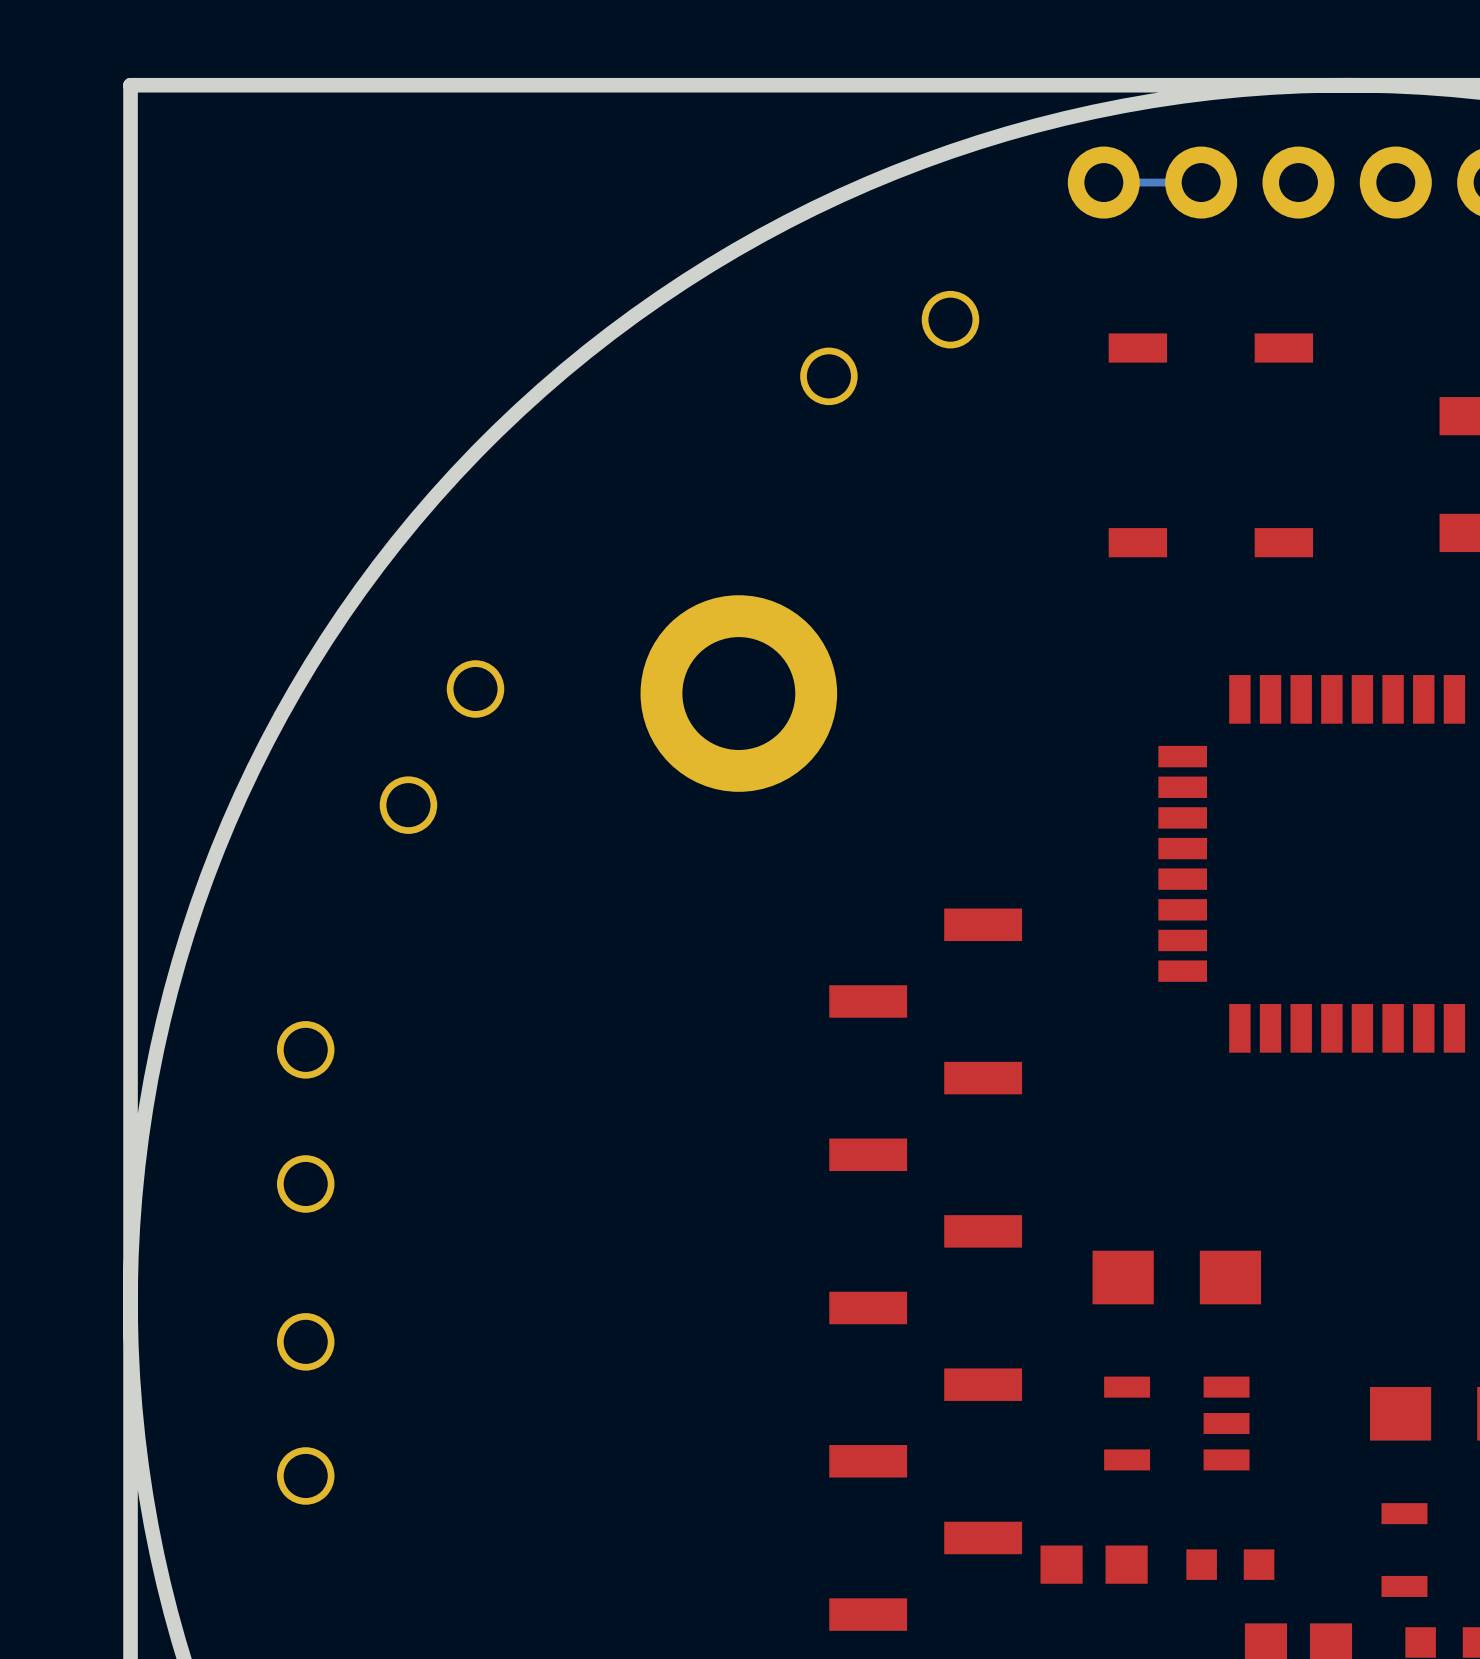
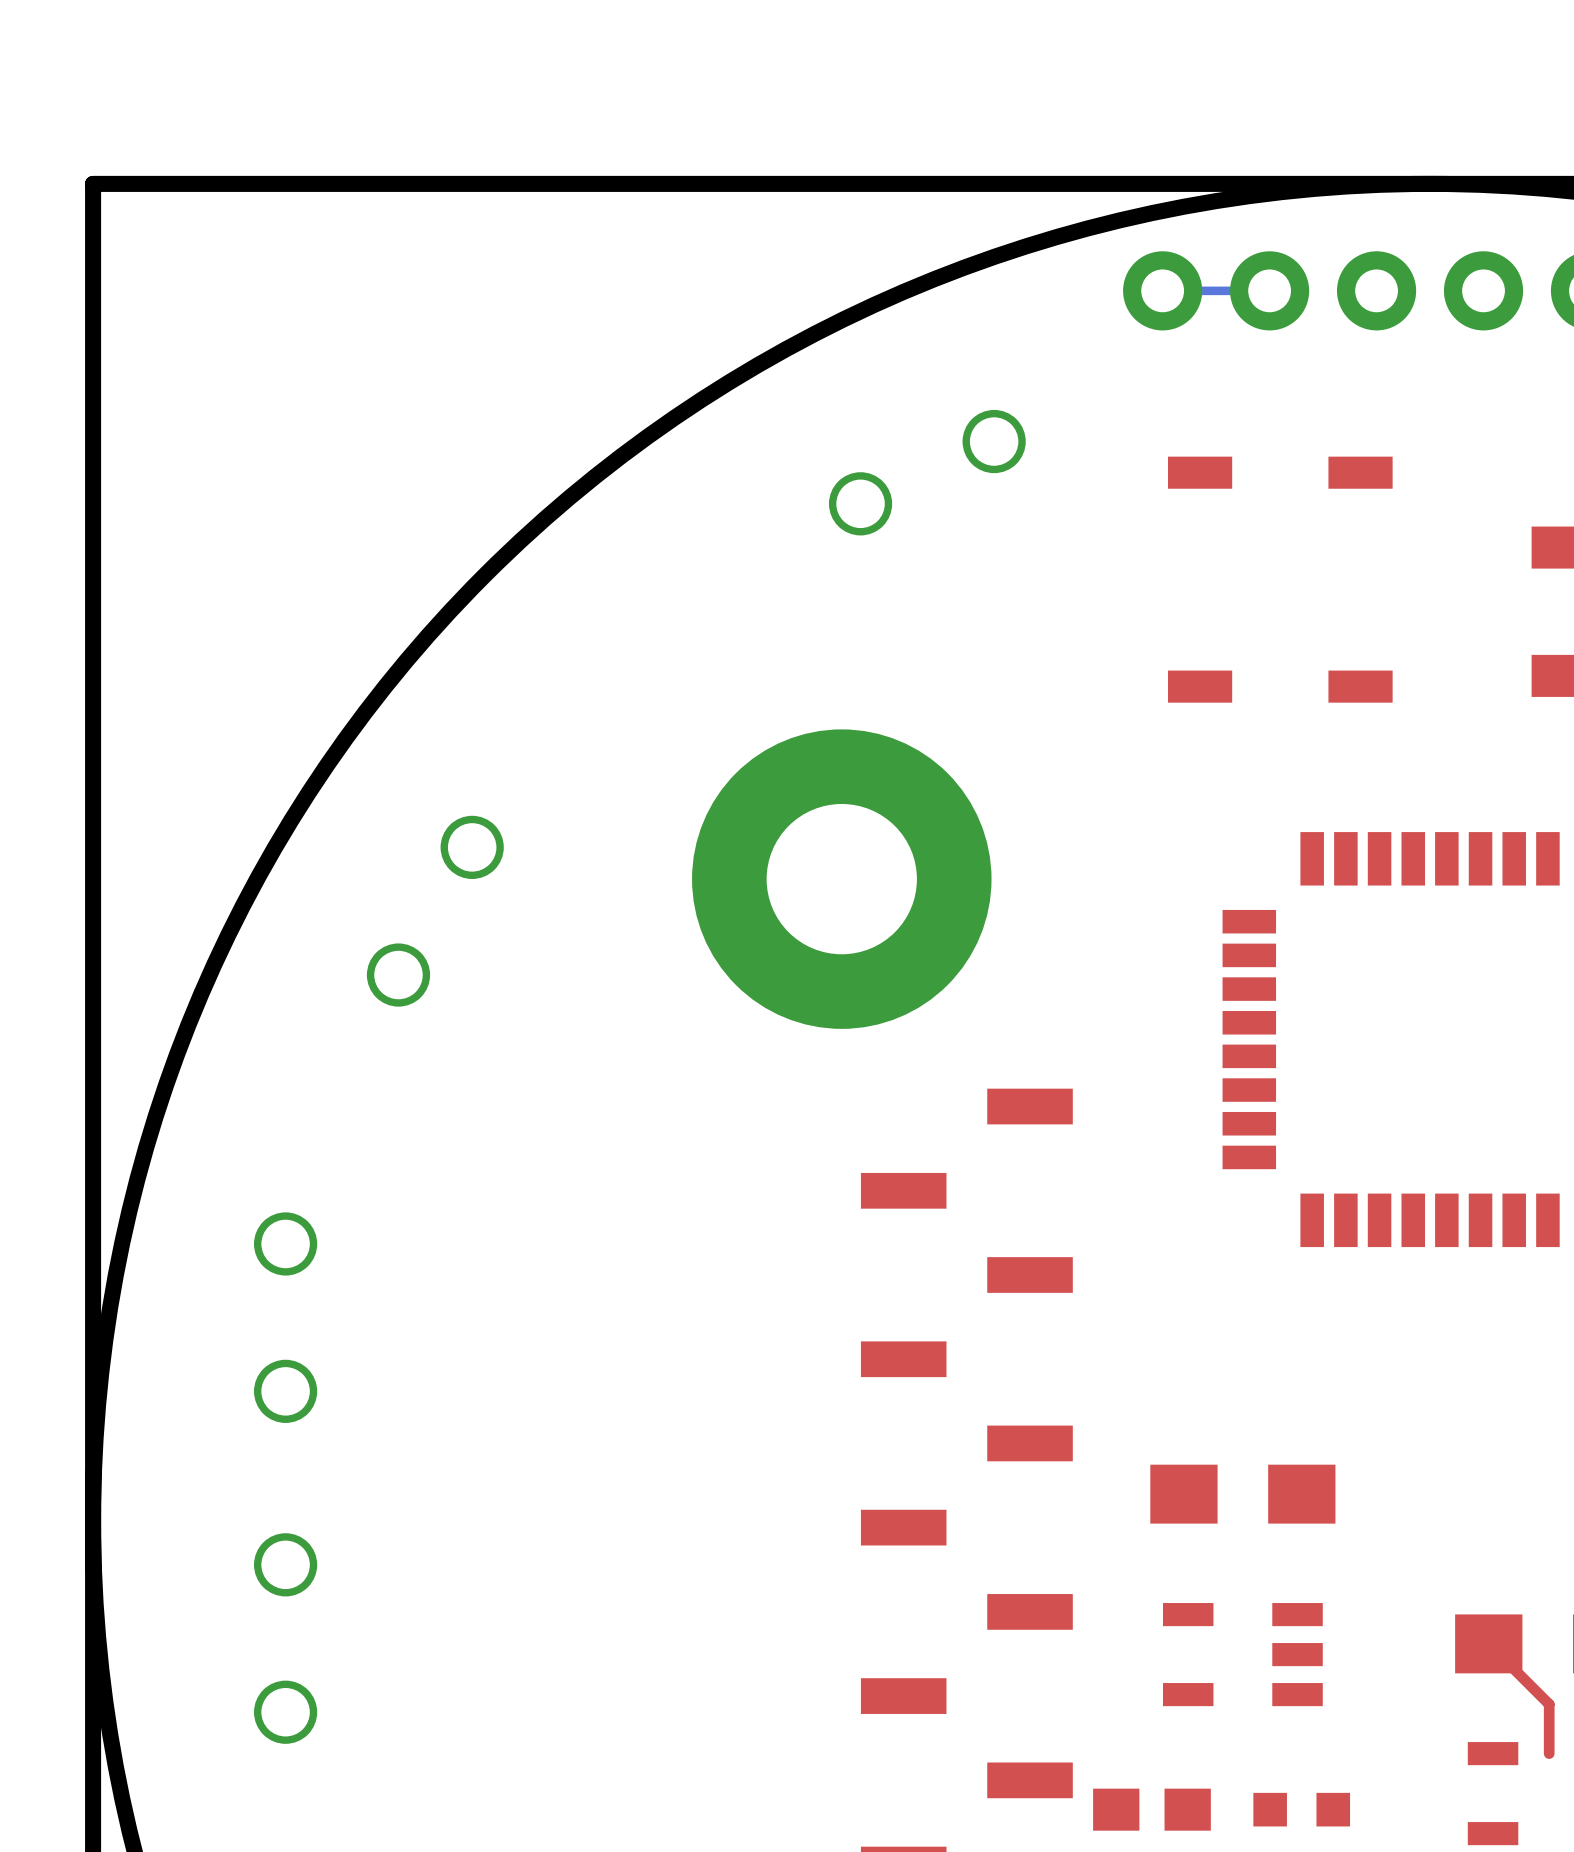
part: (738, 693) -> none
part: none -> (841, 879)
top track: none -> (1488, 1643) (1549, 1704) (1549, 1753)

